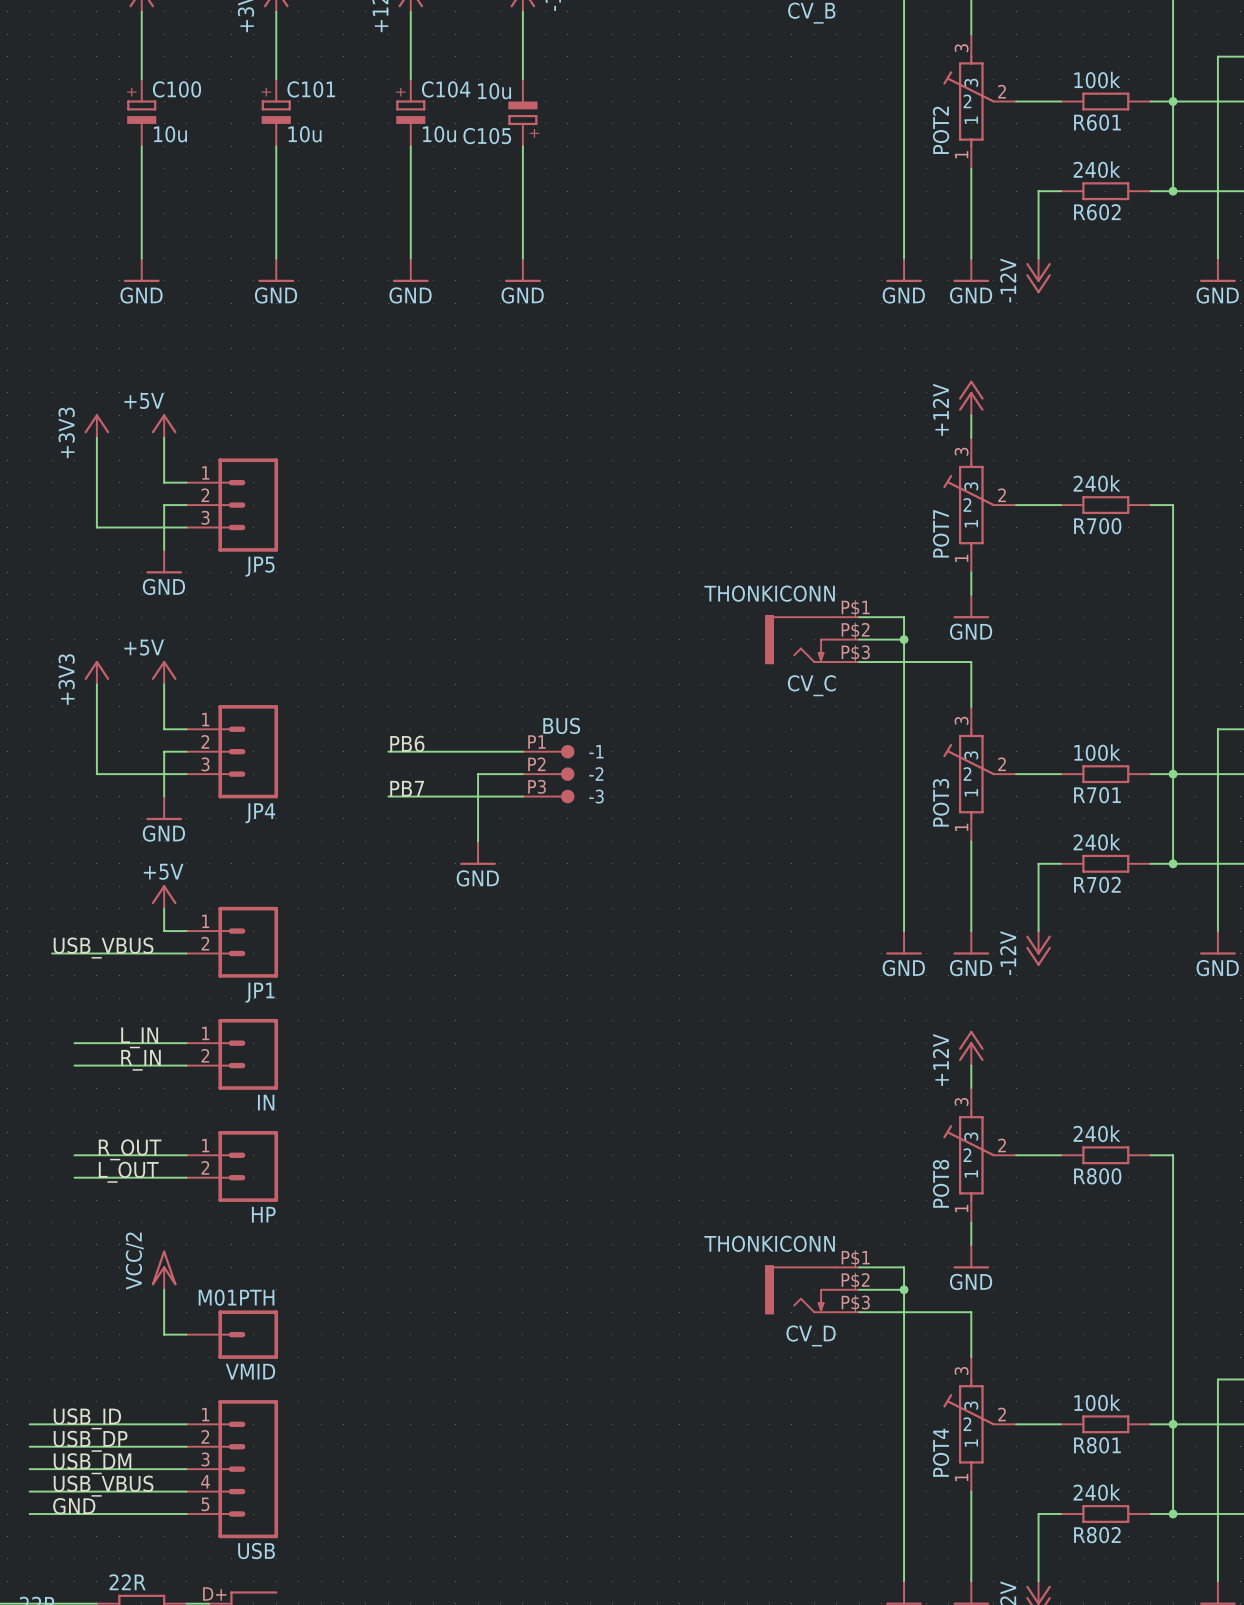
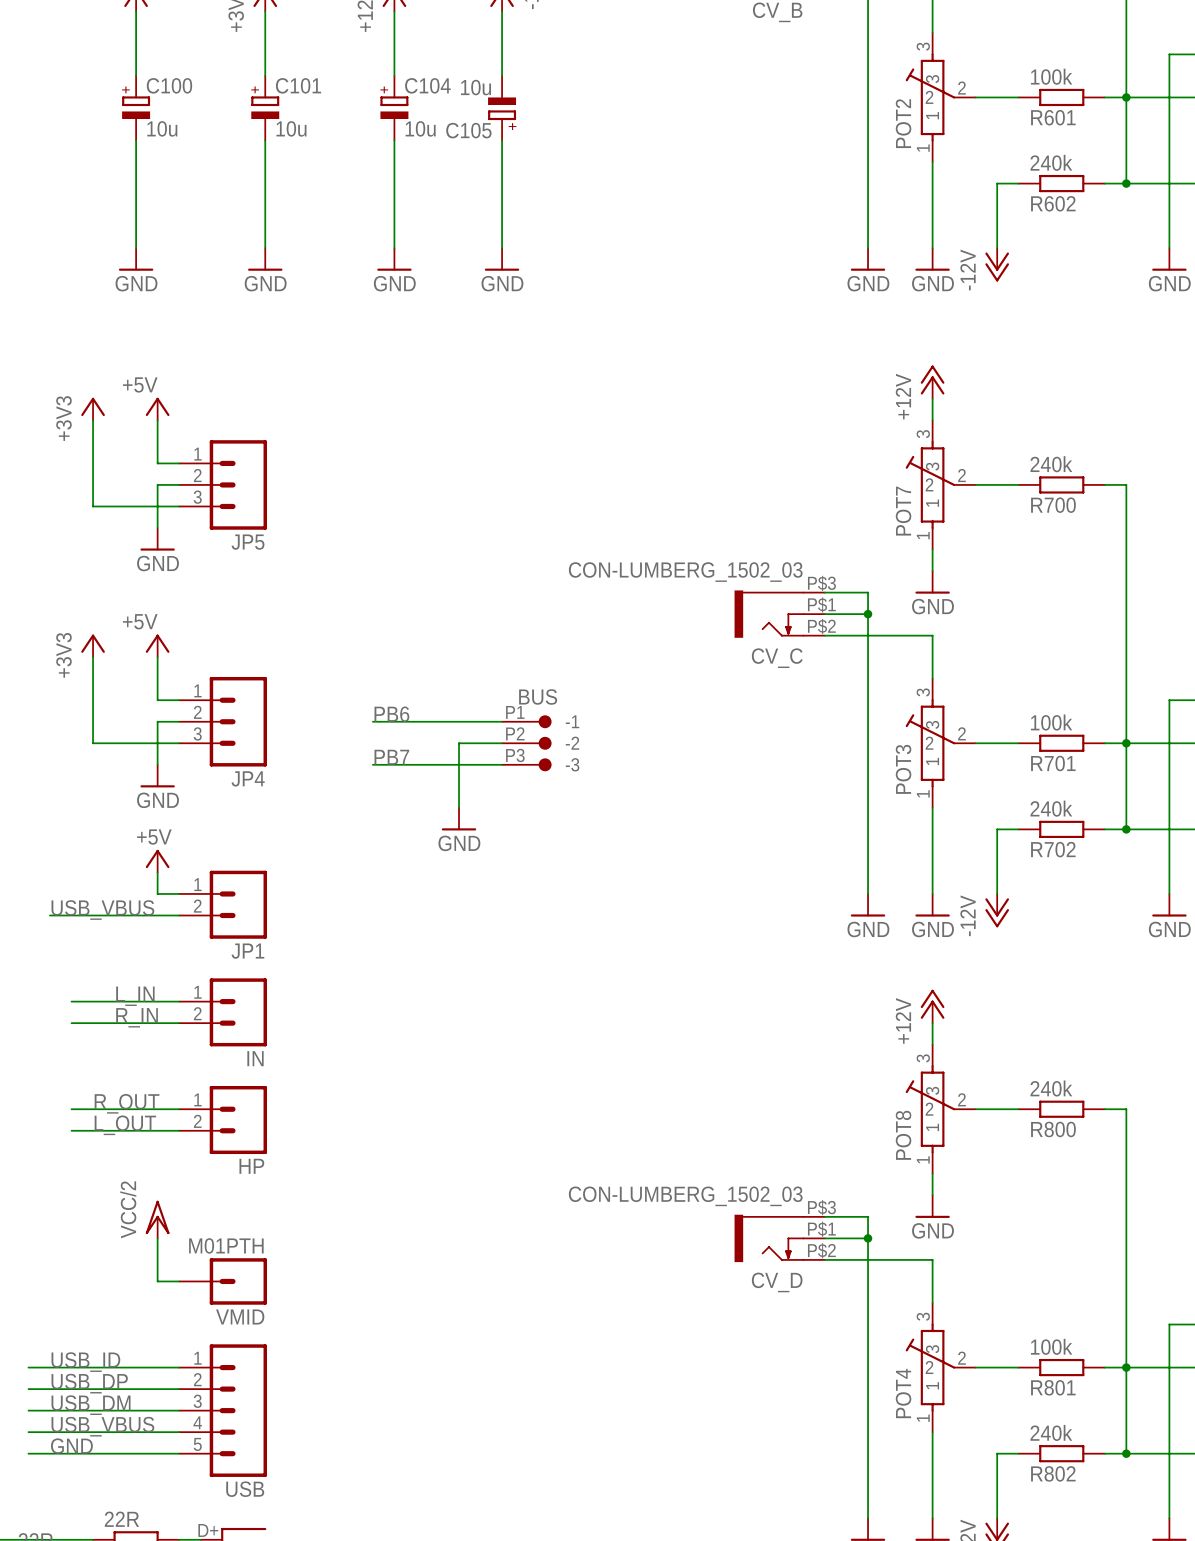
CV_C value: THONKICONN (769, 593) -> CON-LUMBERG_1502_03 (685, 572)
CV_C pin number: P$1 (855, 608) -> P$3 (821, 583)
CV_C pin number: P$2 (855, 630) -> P$1 (821, 604)
CV_C pin number: P$3 (855, 653) -> P$2 (821, 626)
CV_D value: THONKICONN (769, 1243) -> CON-LUMBERG_1502_03 (685, 1196)
CV_D pin number: P$1 (855, 1258) -> P$3 (821, 1207)
CV_D pin number: P$2 (855, 1281) -> P$1 (821, 1229)
CV_D pin number: P$3 (855, 1303) -> P$2 (821, 1250)

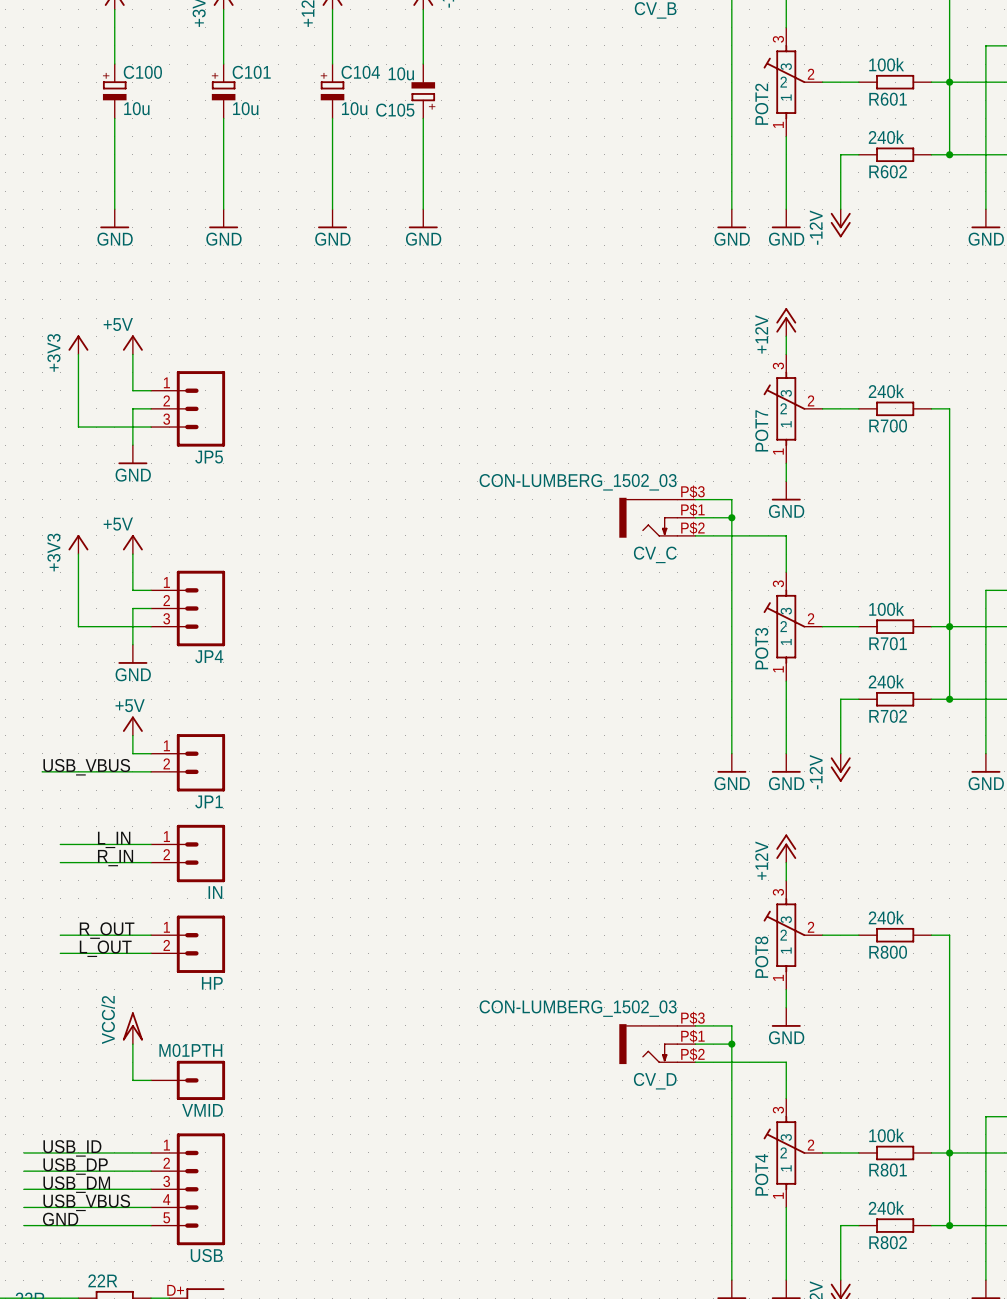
label: PB6 (391, 714) -> none
wire: (372, 721) (502, 721) -> none
wire: (502, 743) (459, 743) (459, 807) -> none
BUS: (526, 743) -> none
label: PB7 (391, 757) -> none
wire: (372, 764) (502, 764) -> none
power symbol: GND (459, 819) -> none

